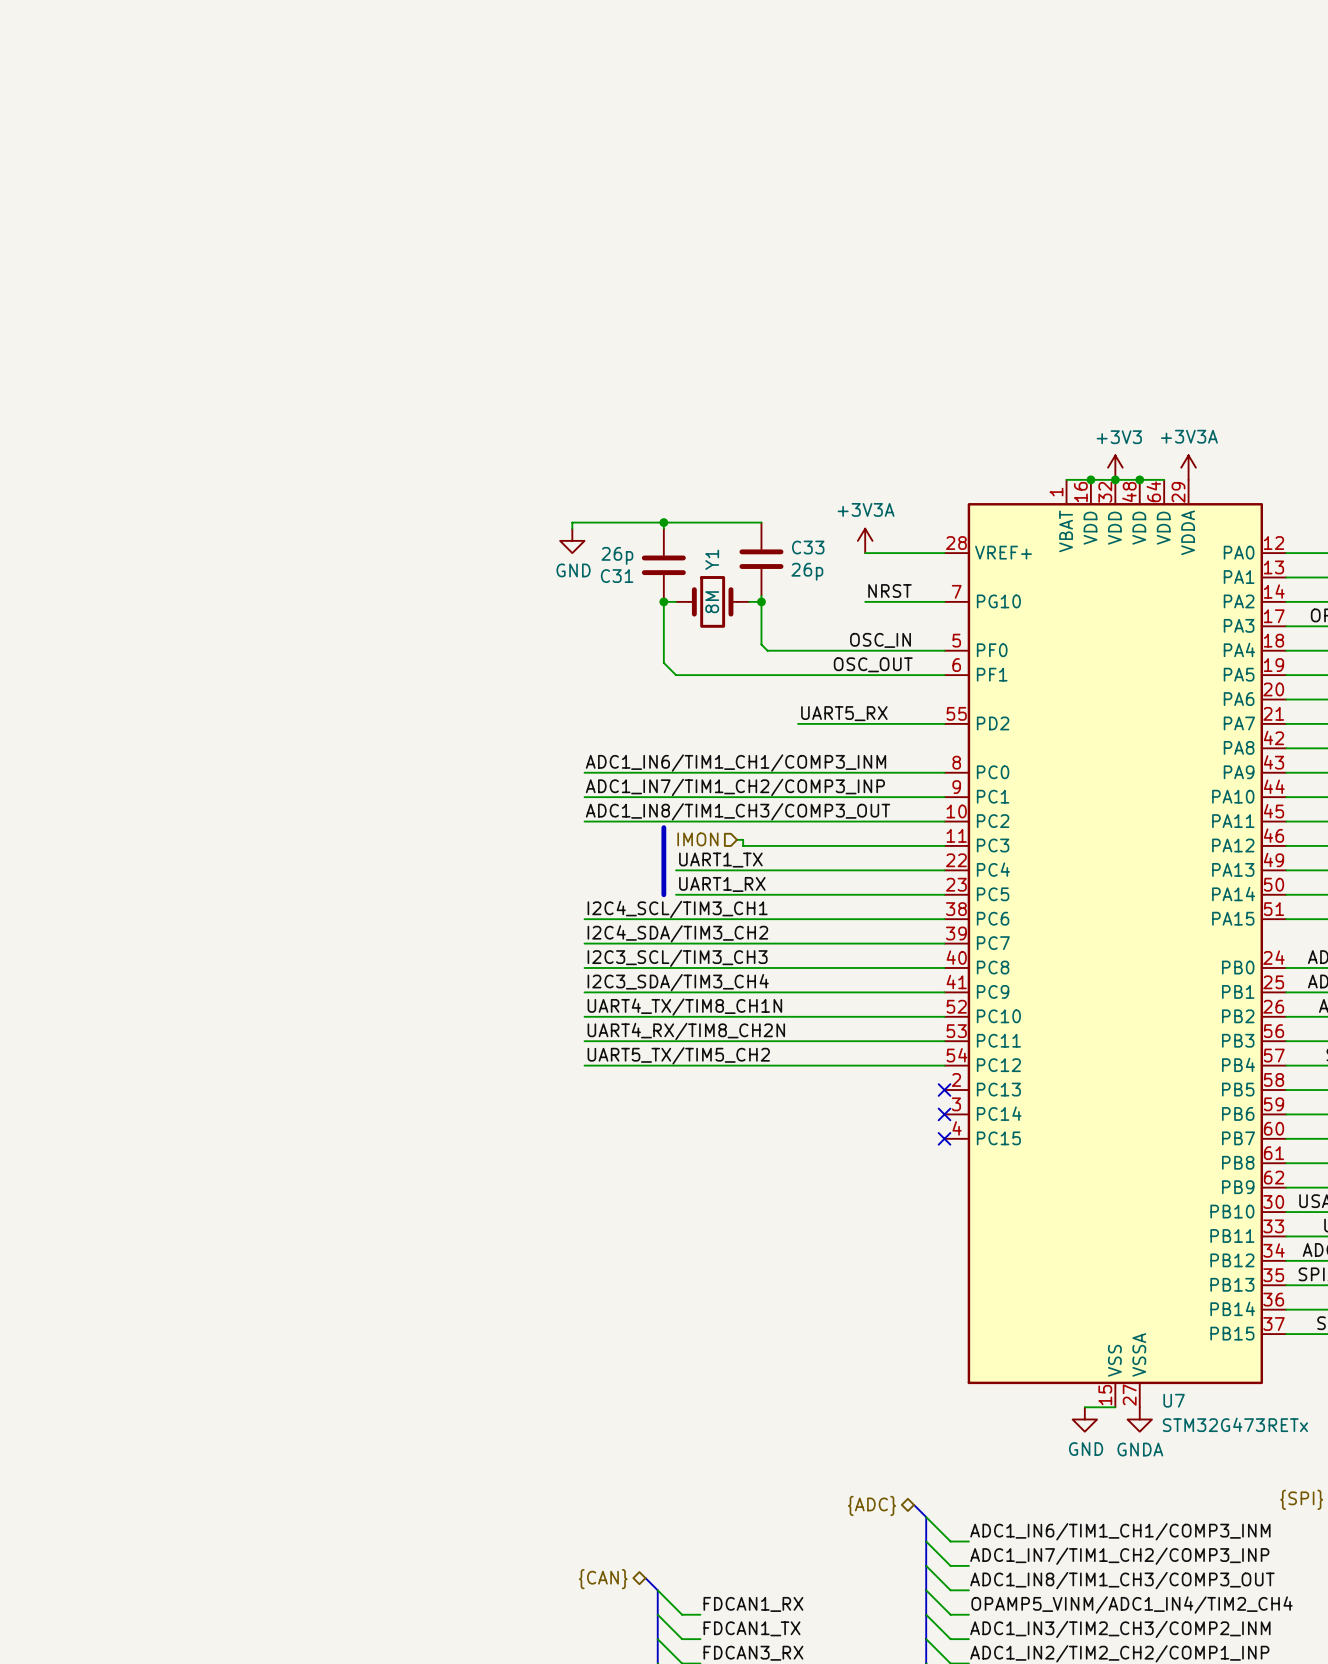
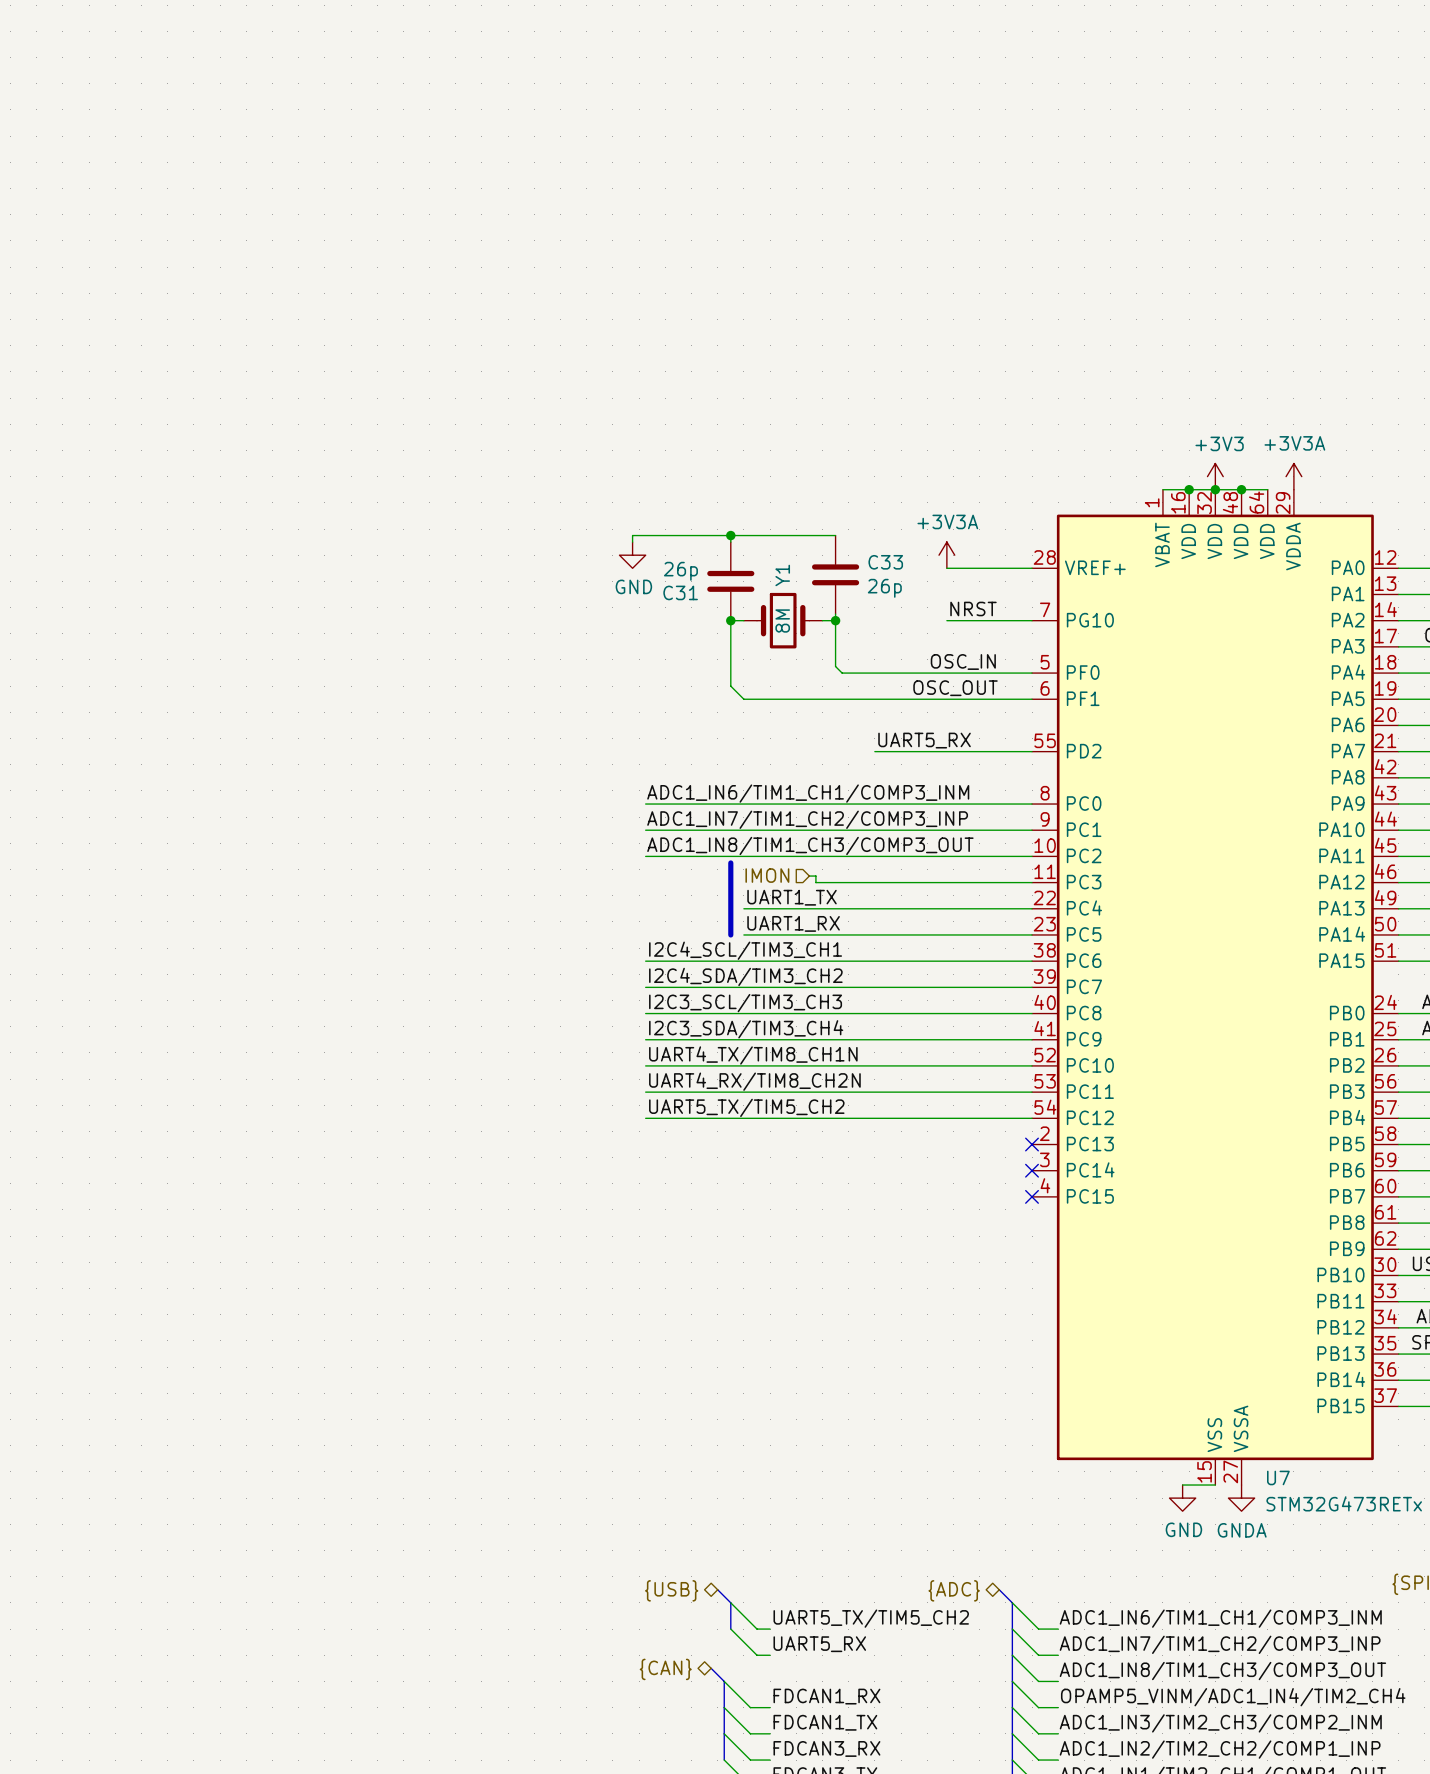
bus: none -> (717, 1589) (730, 1602) (730, 1629)
hierarchical label: none -> {USB} (671, 1590)
wire: none -> (730, 1602) (756, 1629) (770, 1629)
label: none -> UART5_TX/TIM5_CH2 (871, 1618)
wire: none -> (730, 1629) (756, 1655) (770, 1655)
label: none -> UART5_RX (819, 1644)

